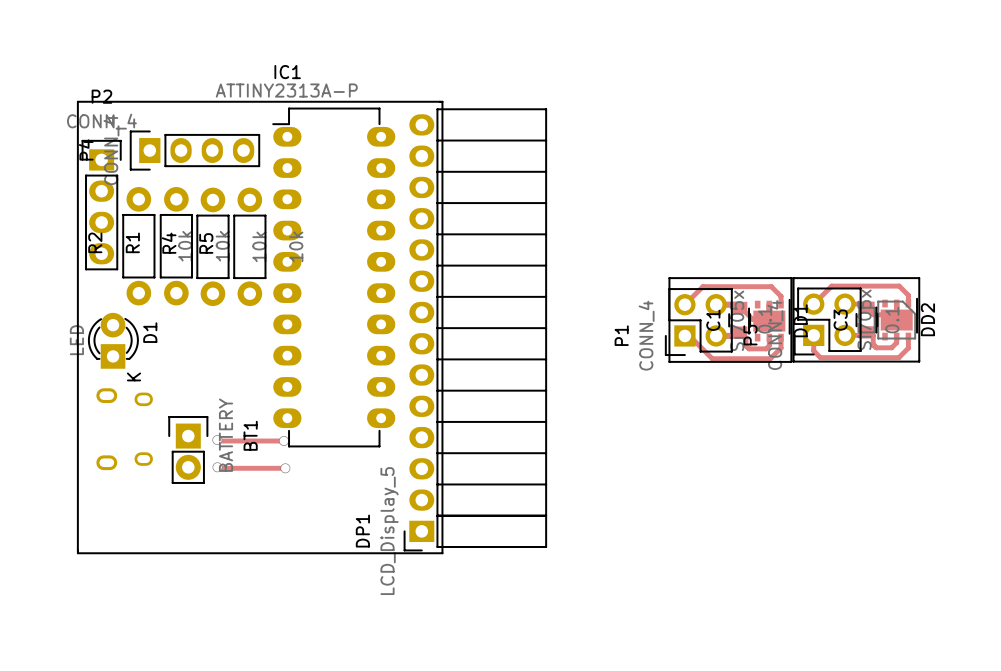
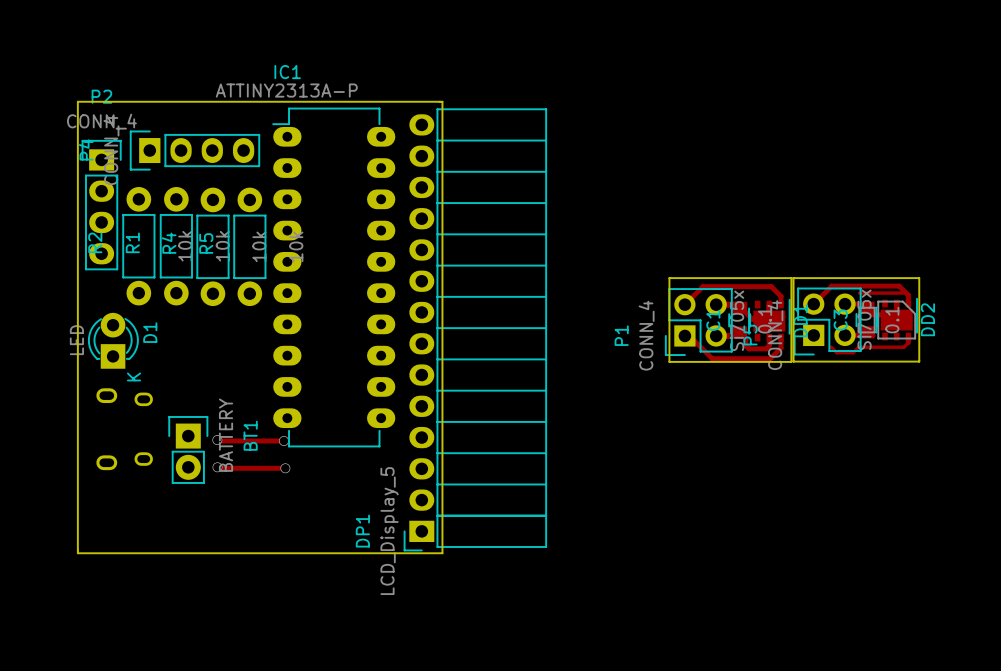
track: none -> (859, 293) (904, 293)
track: (813, 335) (813, 350) (820, 357) (898, 357) (908, 348) (908, 342) -> (831, 347) (836, 352) (853, 352) (858, 347) (903, 347) (908, 342)
track: (873, 335) (873, 344) (876, 347) (891, 347) (896, 342) (896, 337) -> none

